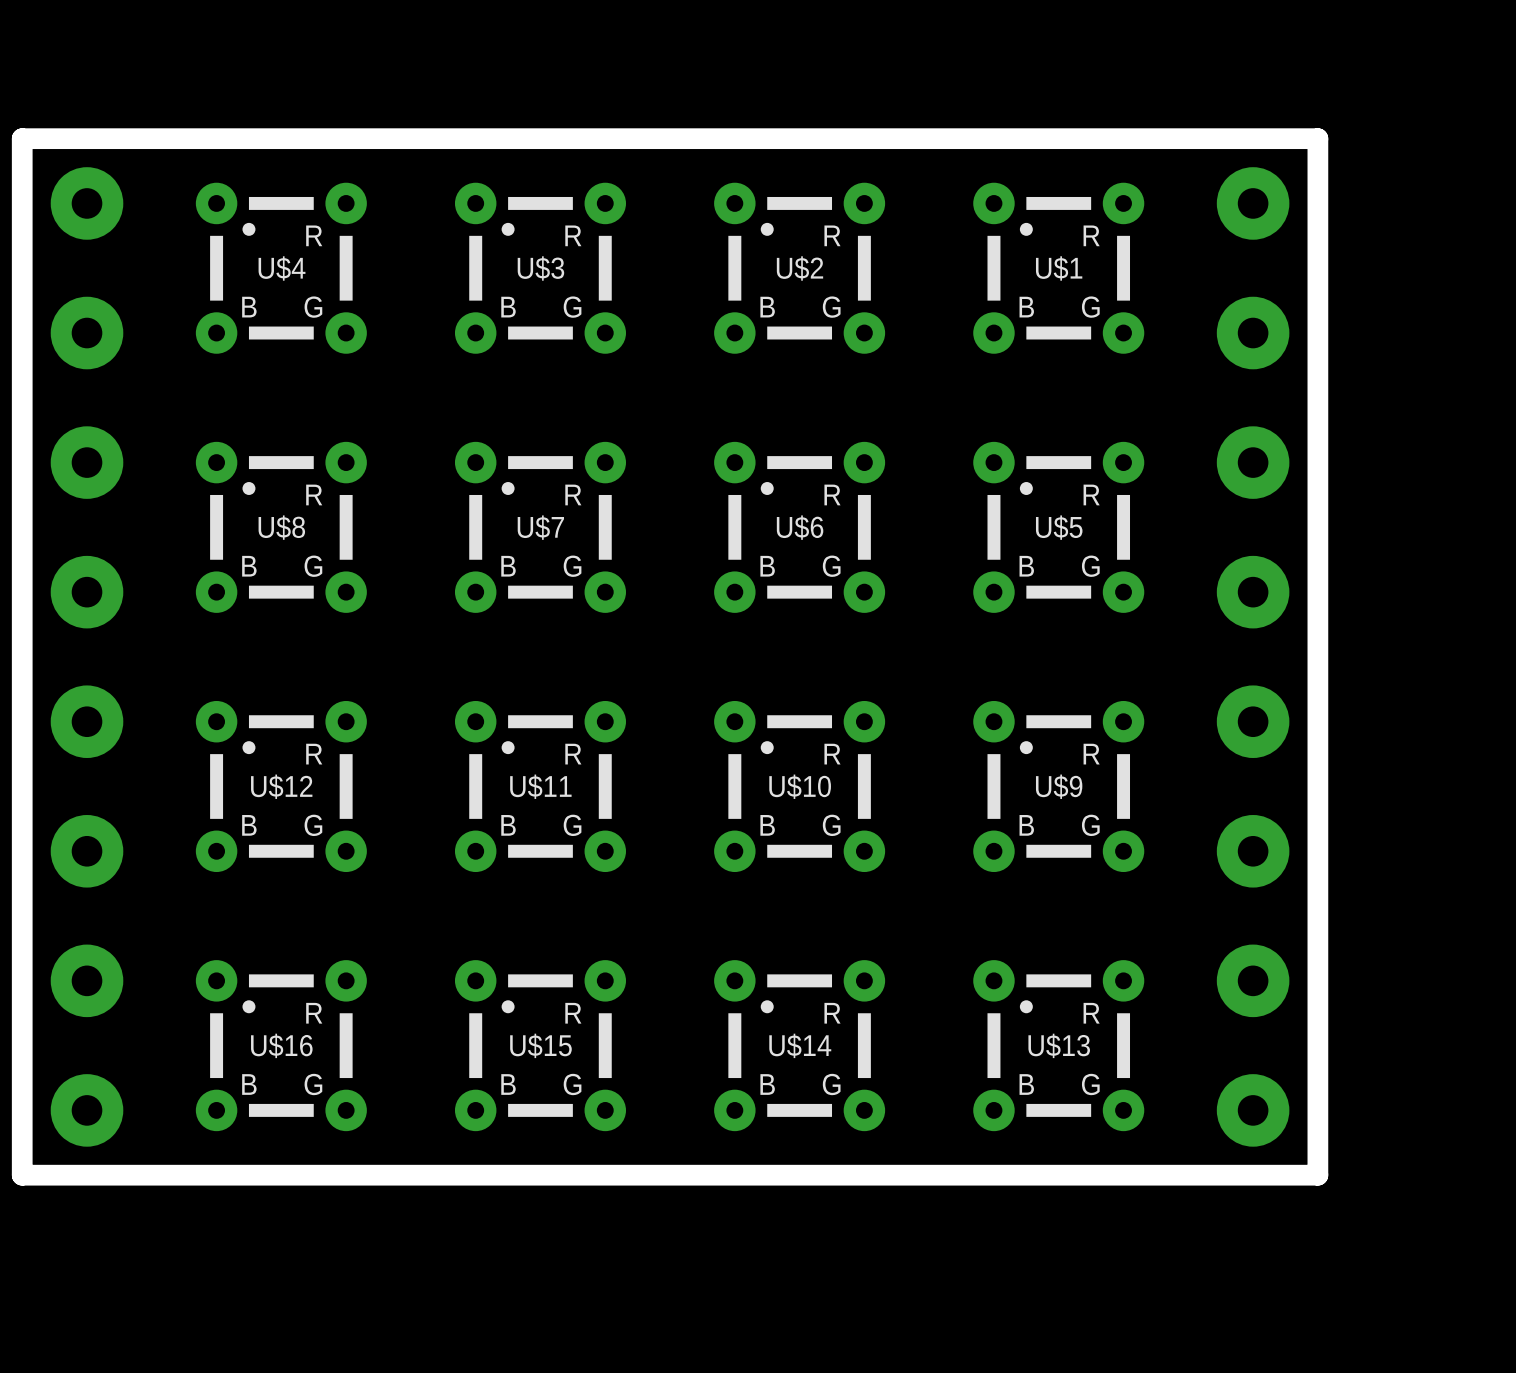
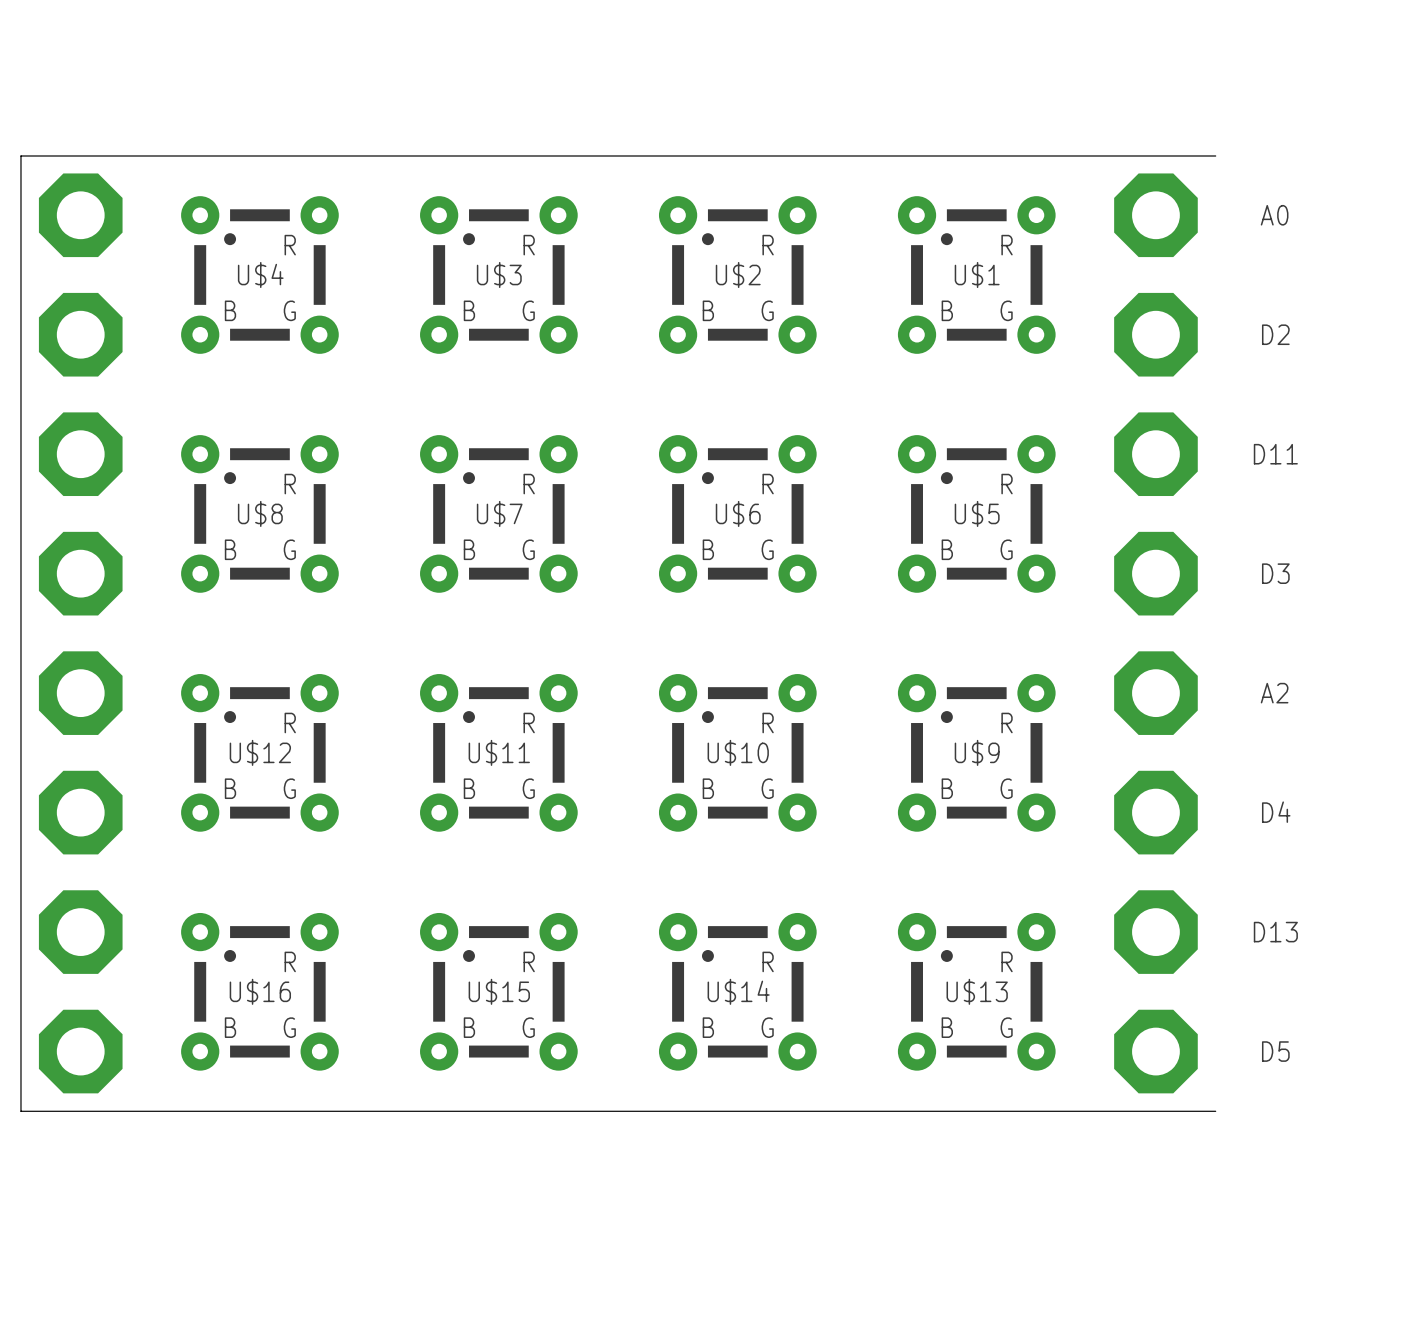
board edge: (22, 138) (1317, 138) (1317, 1175) -> (20, 155) (1215, 155)
board edge width: thick (22, 138) (22, 1175) (1317, 1175) -> thin (21, 155) (21, 1111) (1215, 1111)
part footprint: [50, 167, 124, 1147] -> [38, 173, 123, 1094]
part footprint: [1216, 167, 1290, 1147] -> [1114, 173, 1198, 1094]
text: none -> A0 (1274, 215)
text: none -> D2 (1275, 334)
text: none -> D11 (1275, 454)
text: none -> D3 (1275, 573)
text: none -> A2 (1274, 693)
text: none -> D4 (1276, 812)
text: none -> D13 (1275, 932)
text: none -> D5 (1275, 1051)

